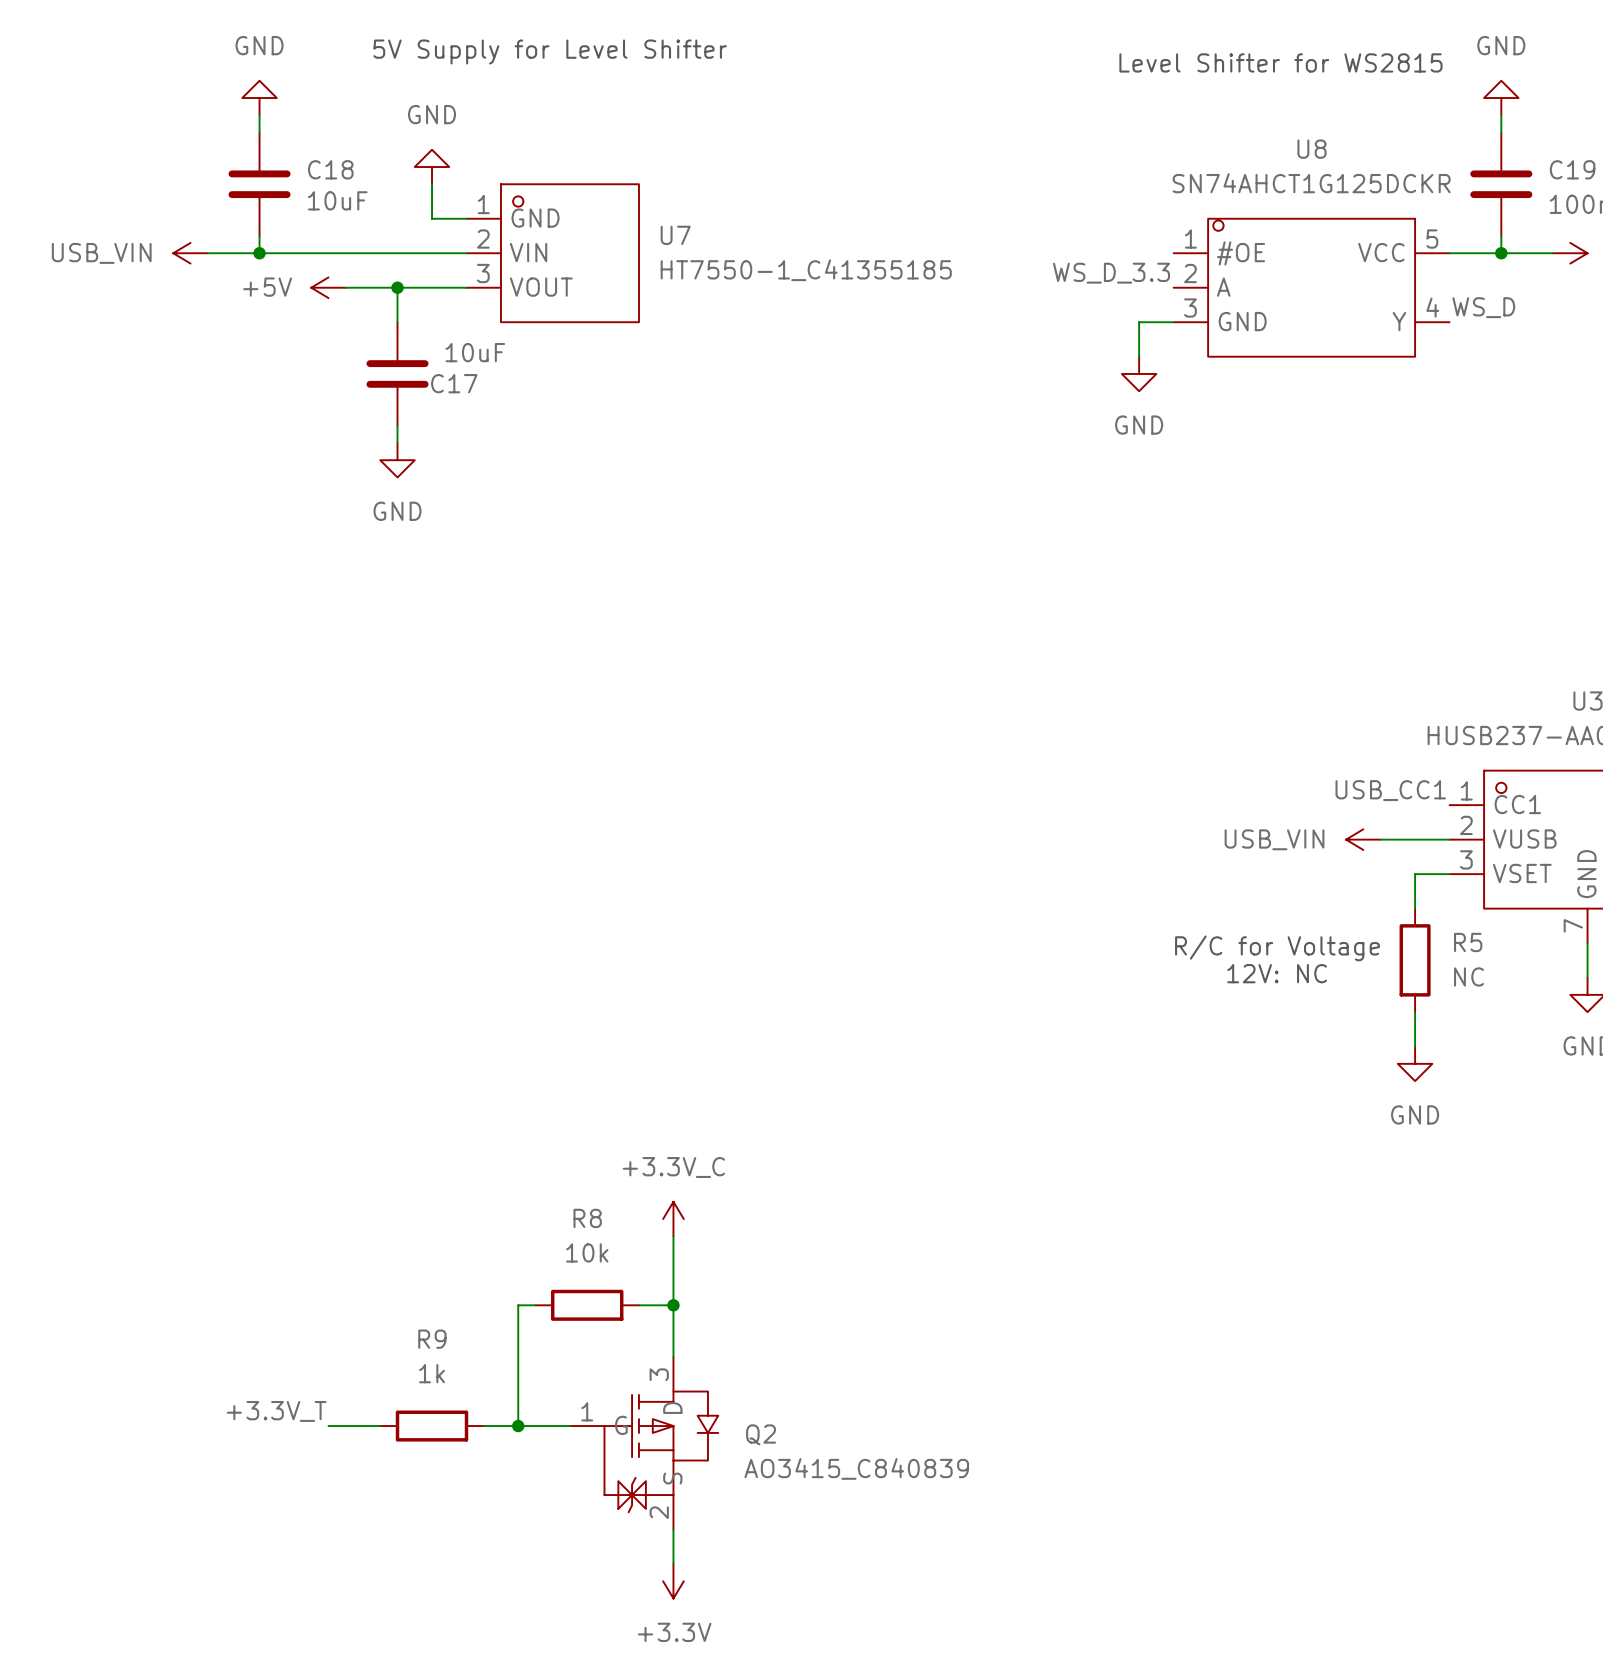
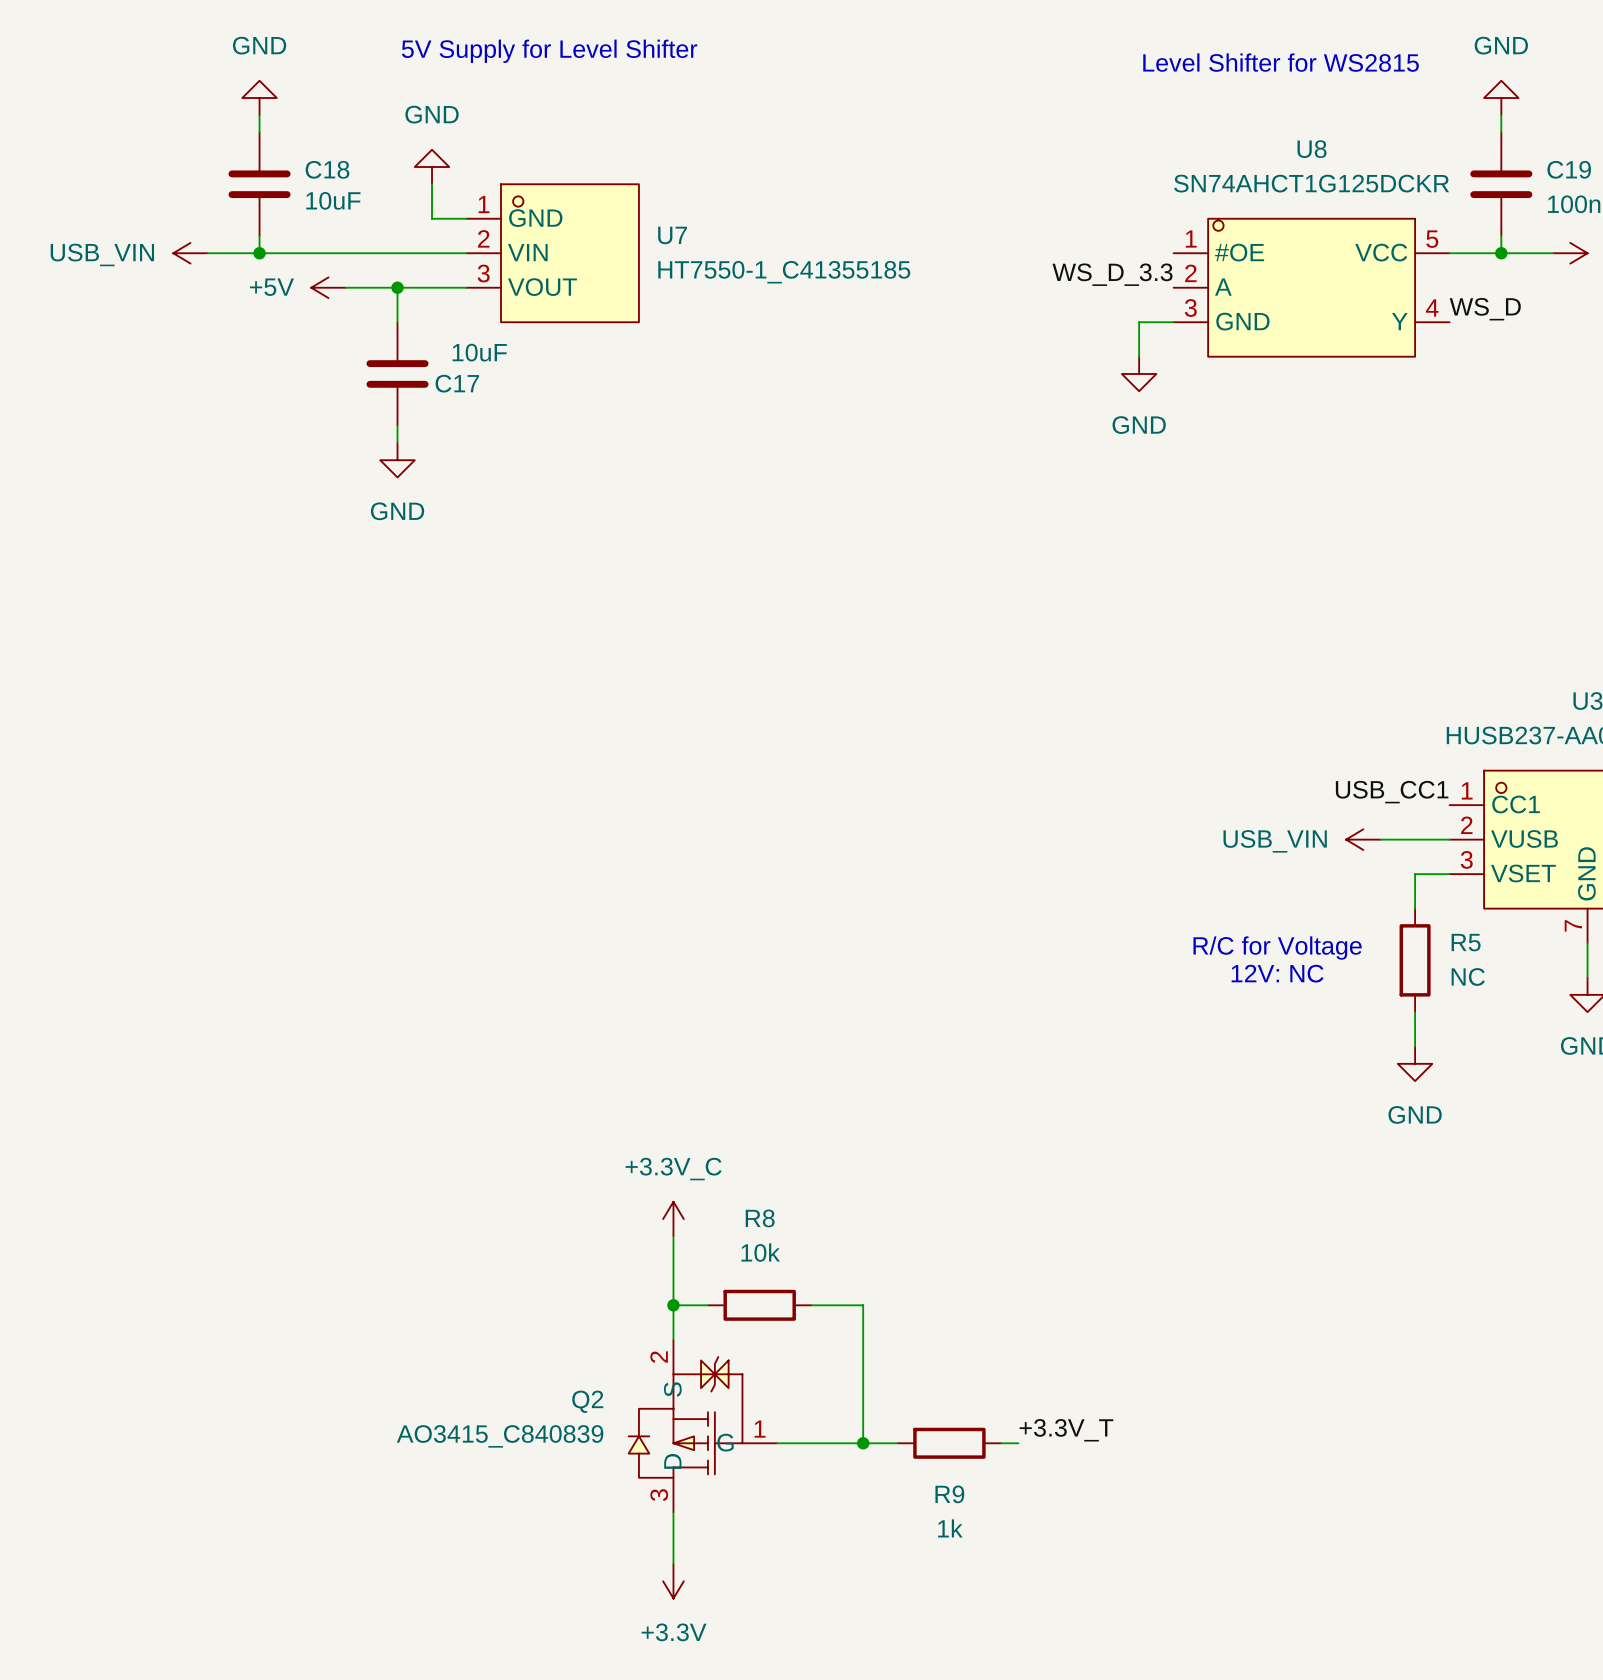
wire: (535, 1305) (518, 1305) (518, 1426) -> none
R8 position: (587, 1305) -> (759, 1305)
wire: (638, 1305) (673, 1305) -> (707, 1305) (673, 1305)
wire: none -> (811, 1305) (863, 1305) (863, 1443)
R9 name position: R9 (432, 1339) -> R9 (949, 1494)
R9 value position: 1k (432, 1373) -> 1k (950, 1528)
label: +3.3V_T (276, 1411) -> none
wire: (328, 1426) (380, 1426) -> none
R9 position: (432, 1426) -> (949, 1443)
wire: (483, 1426) (569, 1426) -> none
junction: (518, 1426) -> none
label: none -> +3.3V_T (1066, 1430)
Q2 name position: Q2 (761, 1434) -> Q2 (587, 1401)
wire: none -> (776, 1443) (897, 1443)
junction: none -> (863, 1443)
wire: none -> (1001, 1443) (1018, 1443)
Q2 rotation: 0° (661, 1451) -> 180° (685, 1417)
Q2 value position: AO3415_C840839 (856, 1468) -> AO3415_C840839 (500, 1436)

